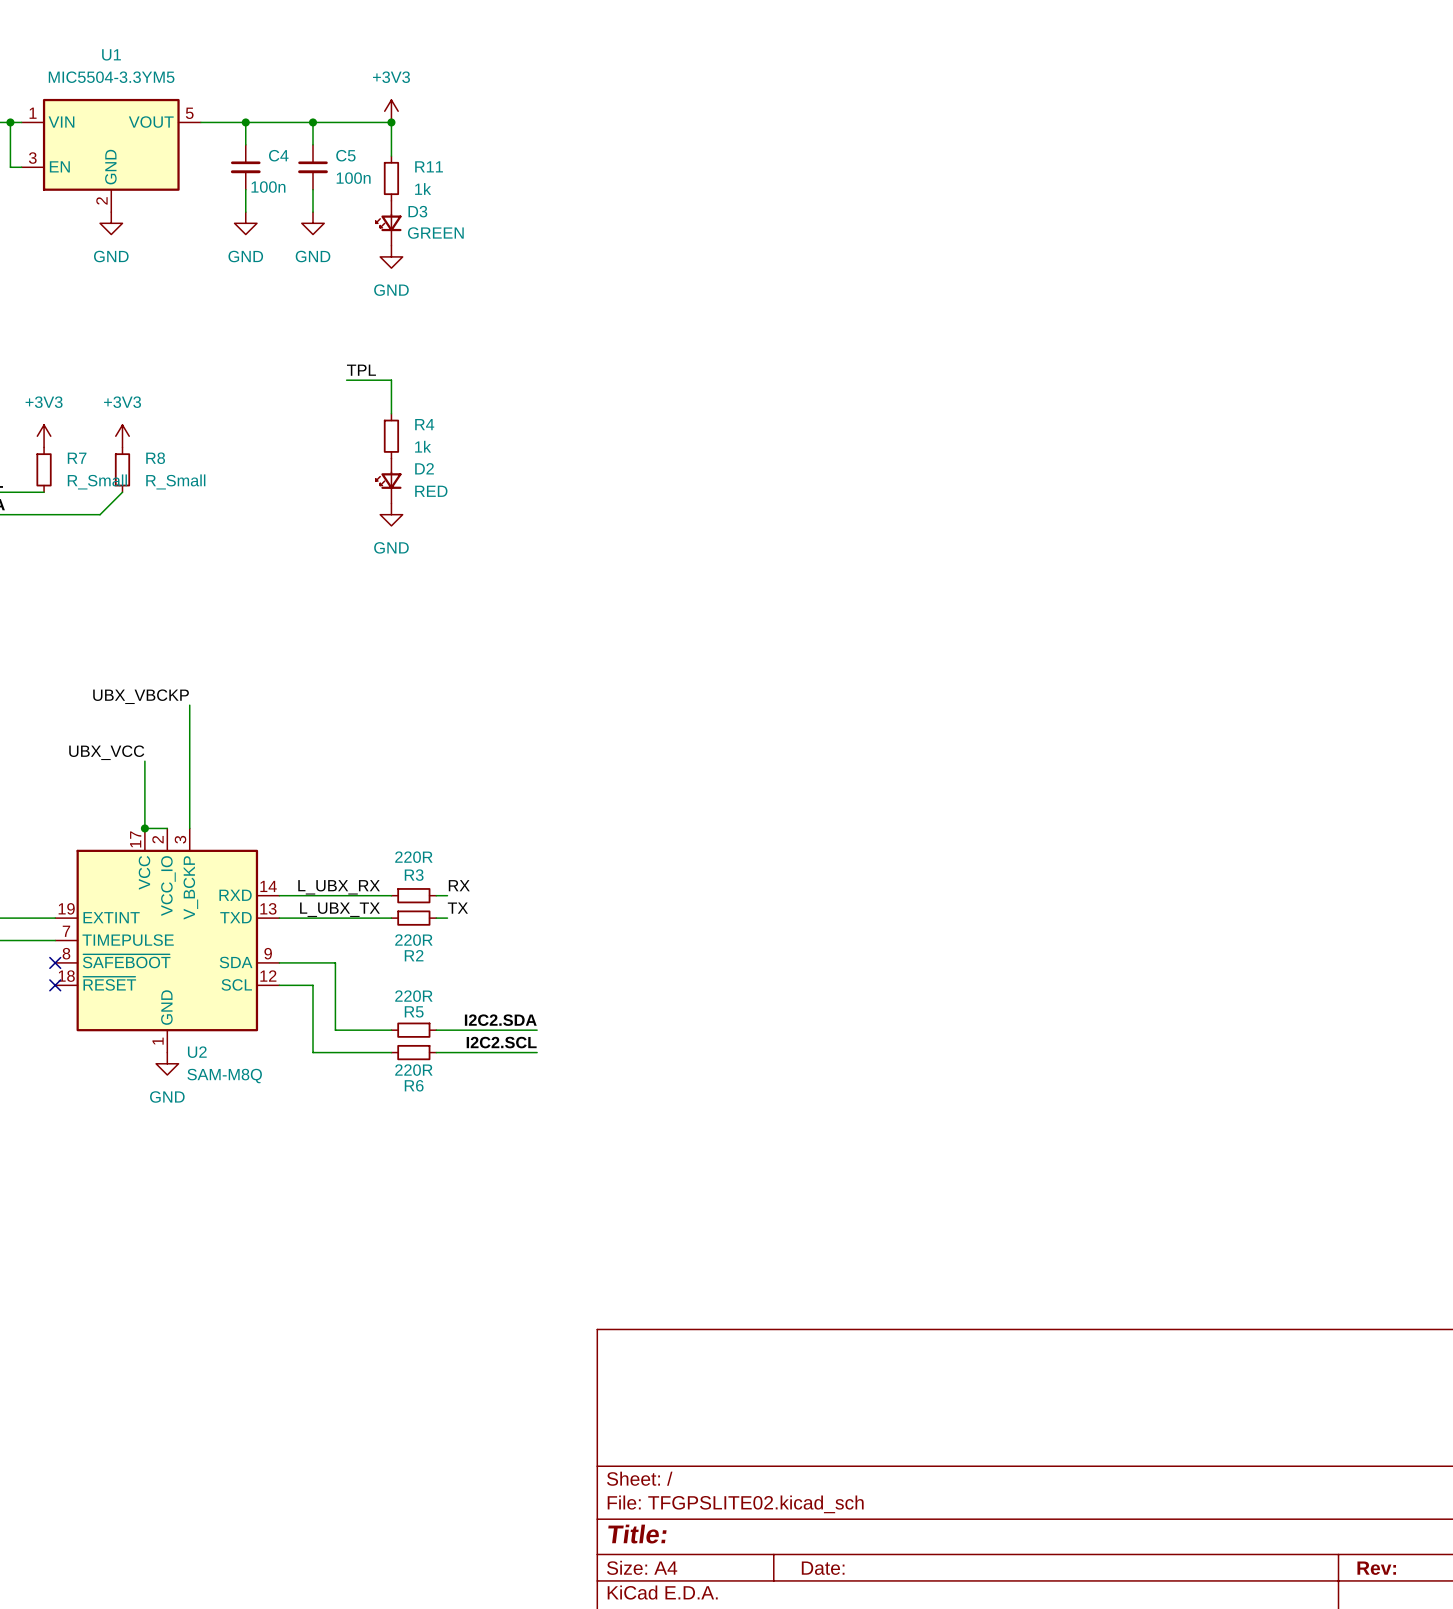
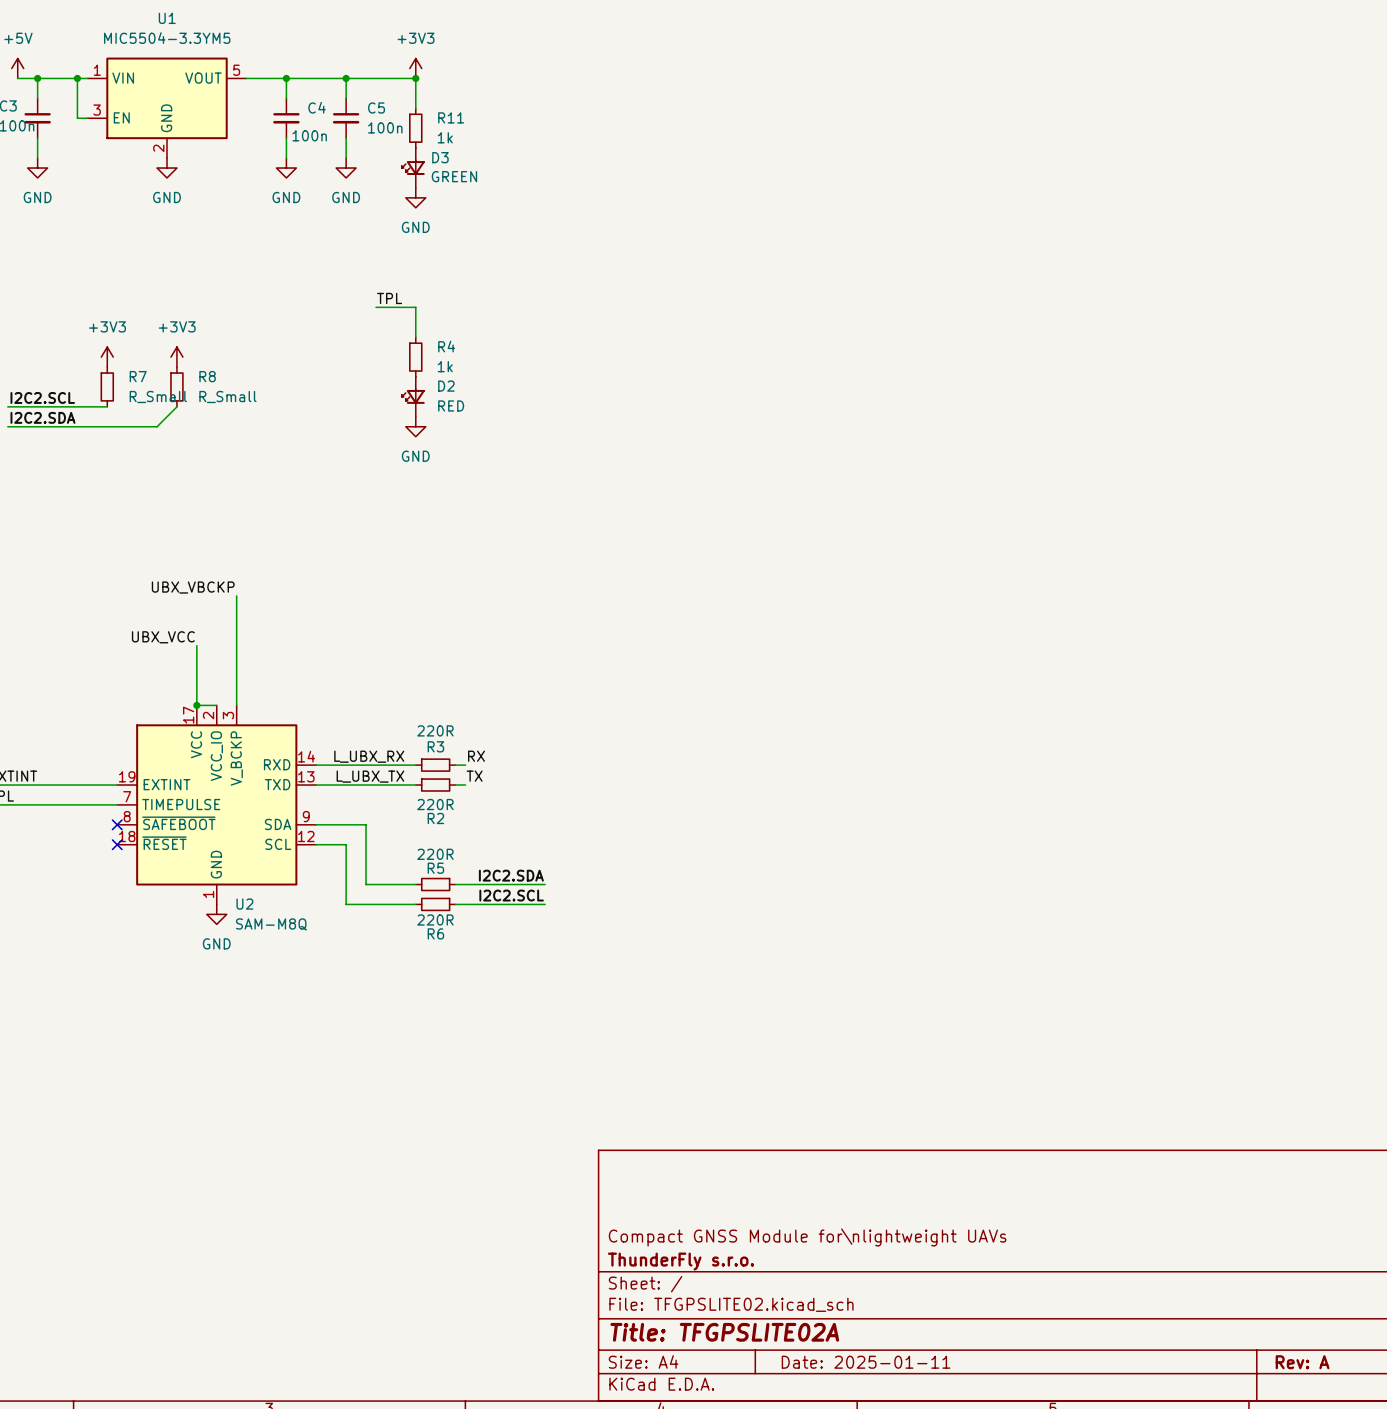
title block: none -> Compact GNSS Module for\nlightweight UAVs (807, 1237)
title block: none -> ThunderFly s.r.o. (681, 1261)
title block: Title: (637, 1534) -> Title: TFGPSLITE02A (724, 1332)
title block: Date: (823, 1568) -> Date: 2025-01-11 (866, 1362)
title block: Rev: (1376, 1568) -> Rev: A (1302, 1362)

